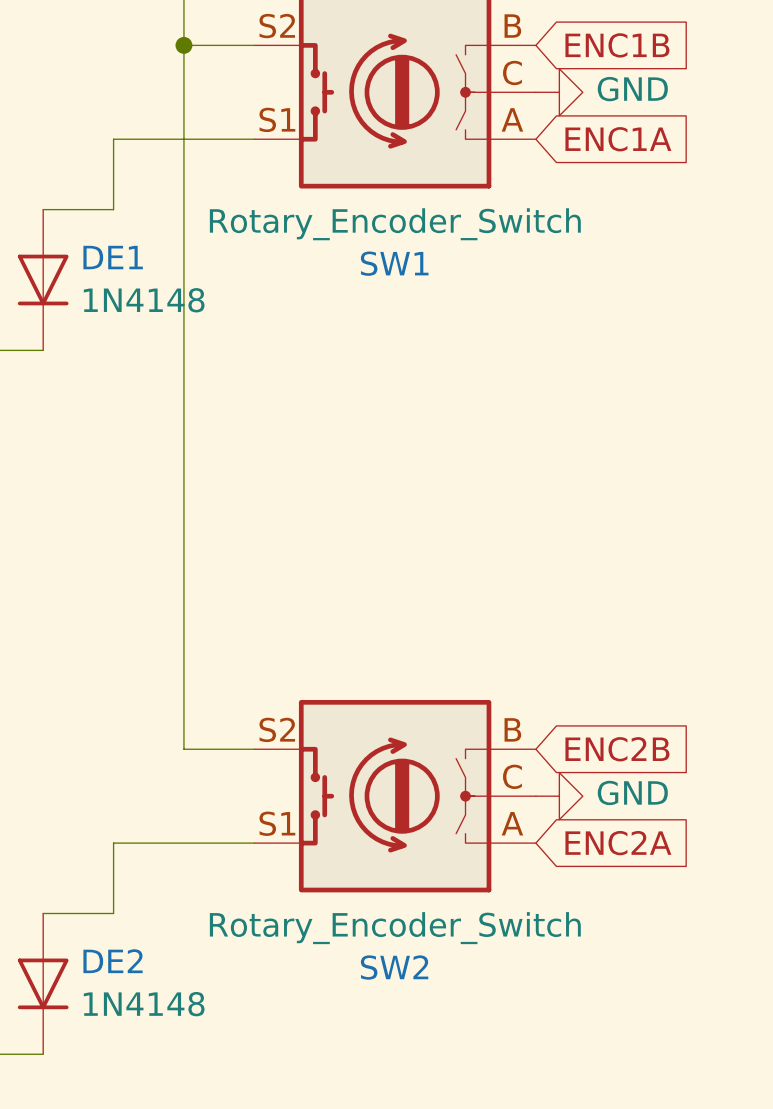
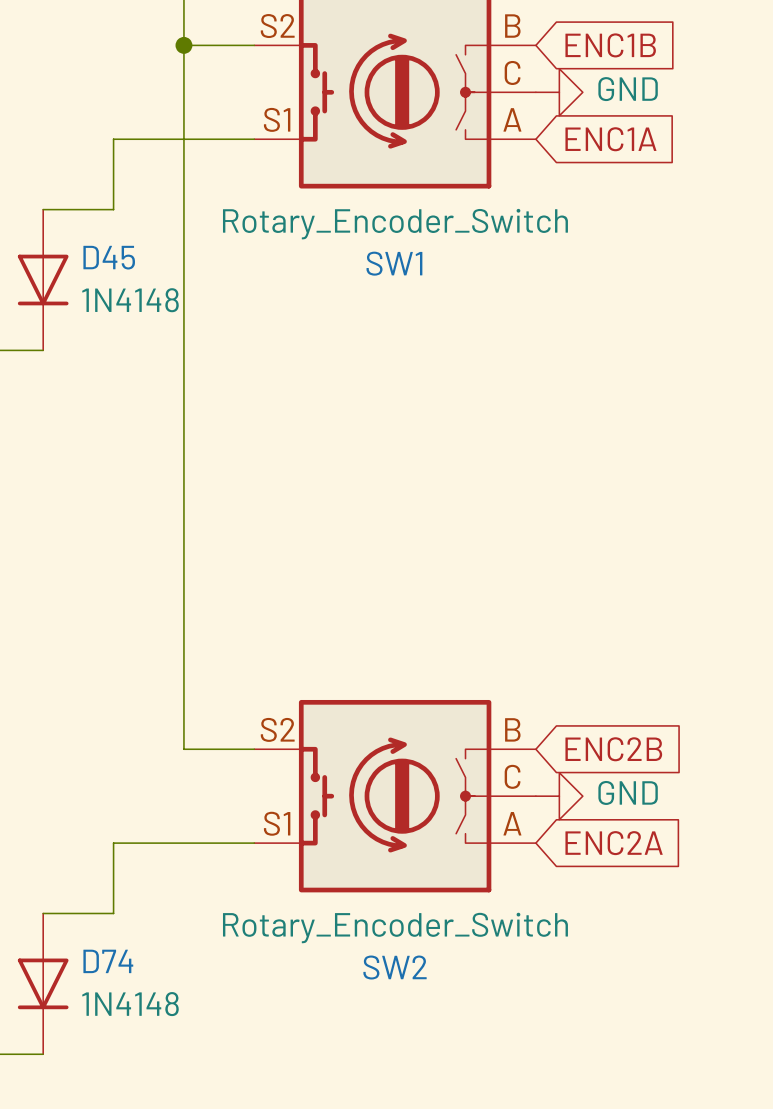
DE1 name: DE1 (113, 257) -> D45 (109, 257)
DE2 name: DE2 (113, 961) -> D74 (108, 961)

